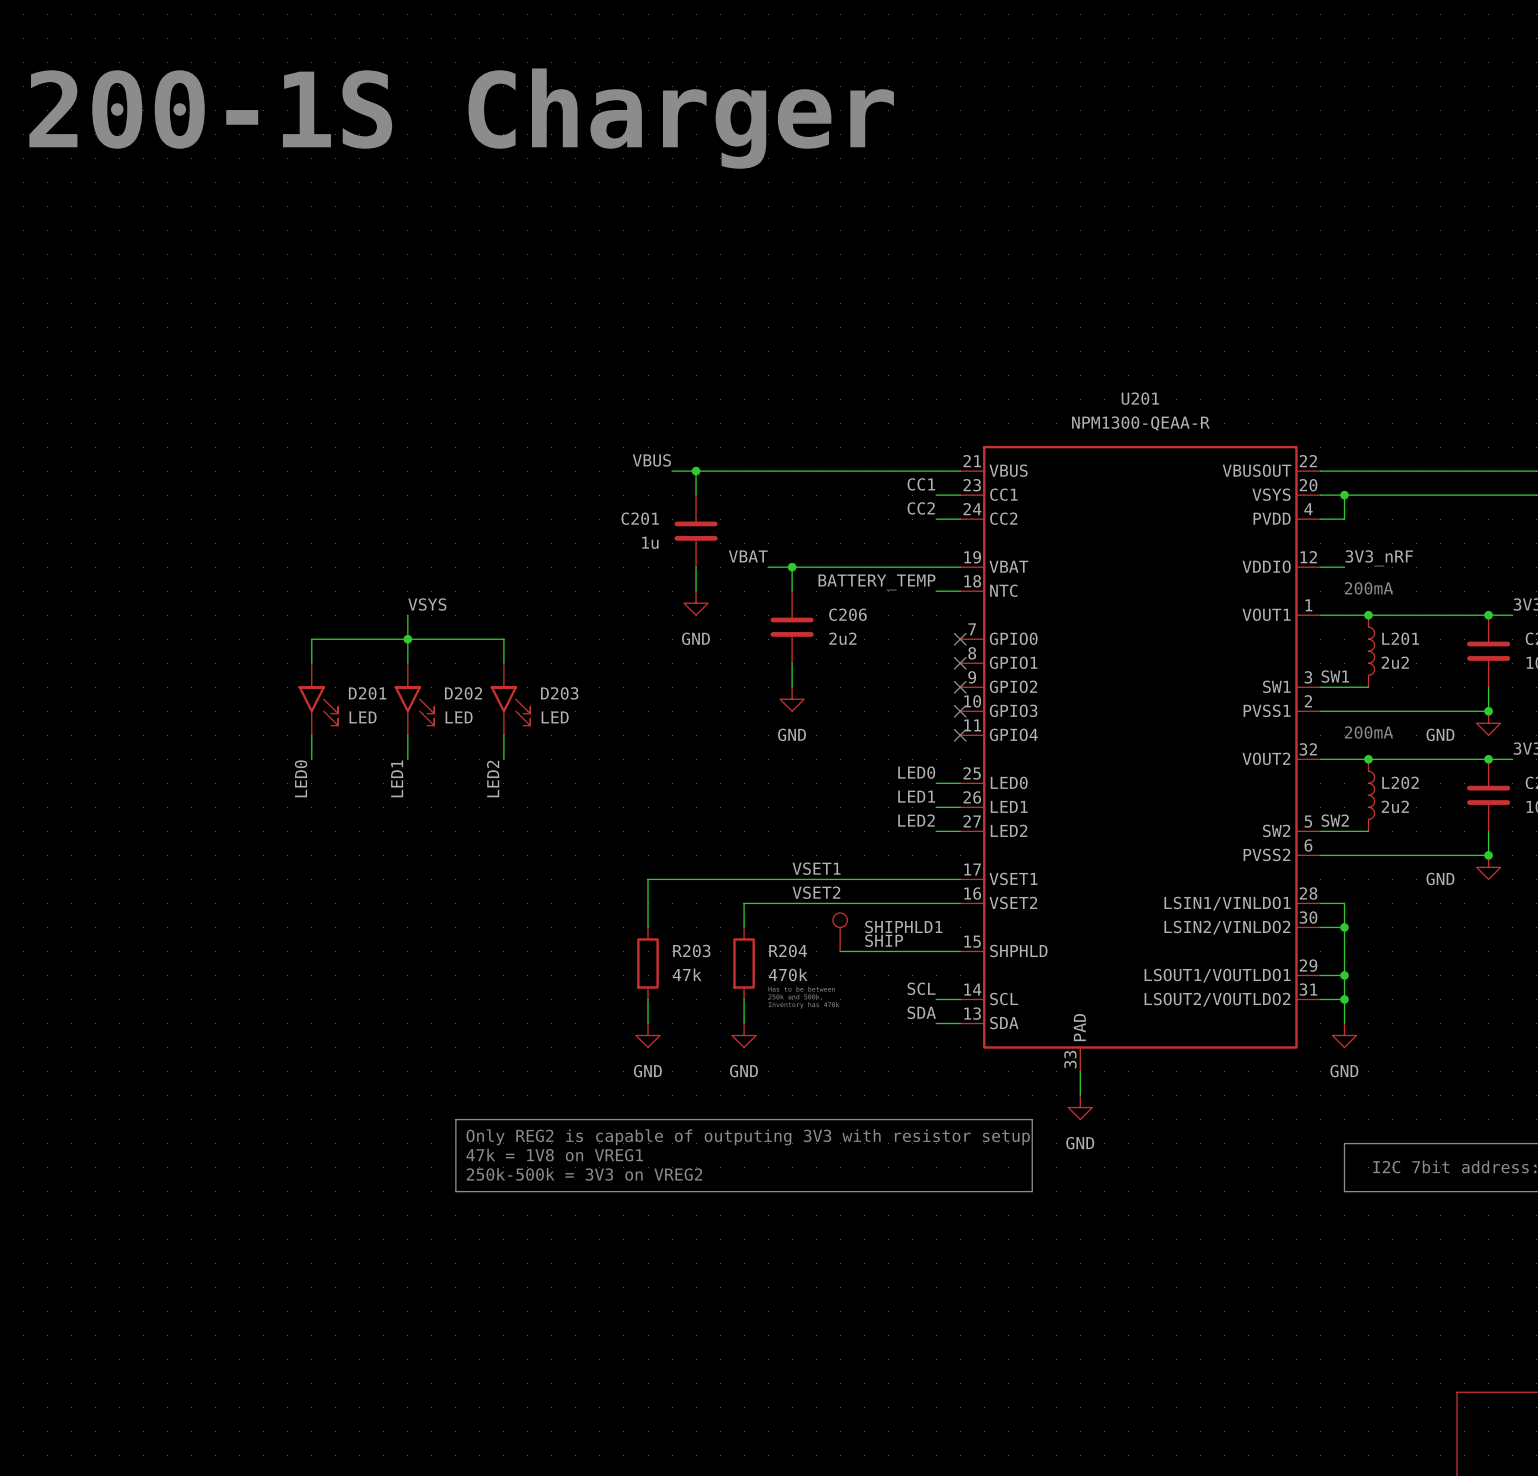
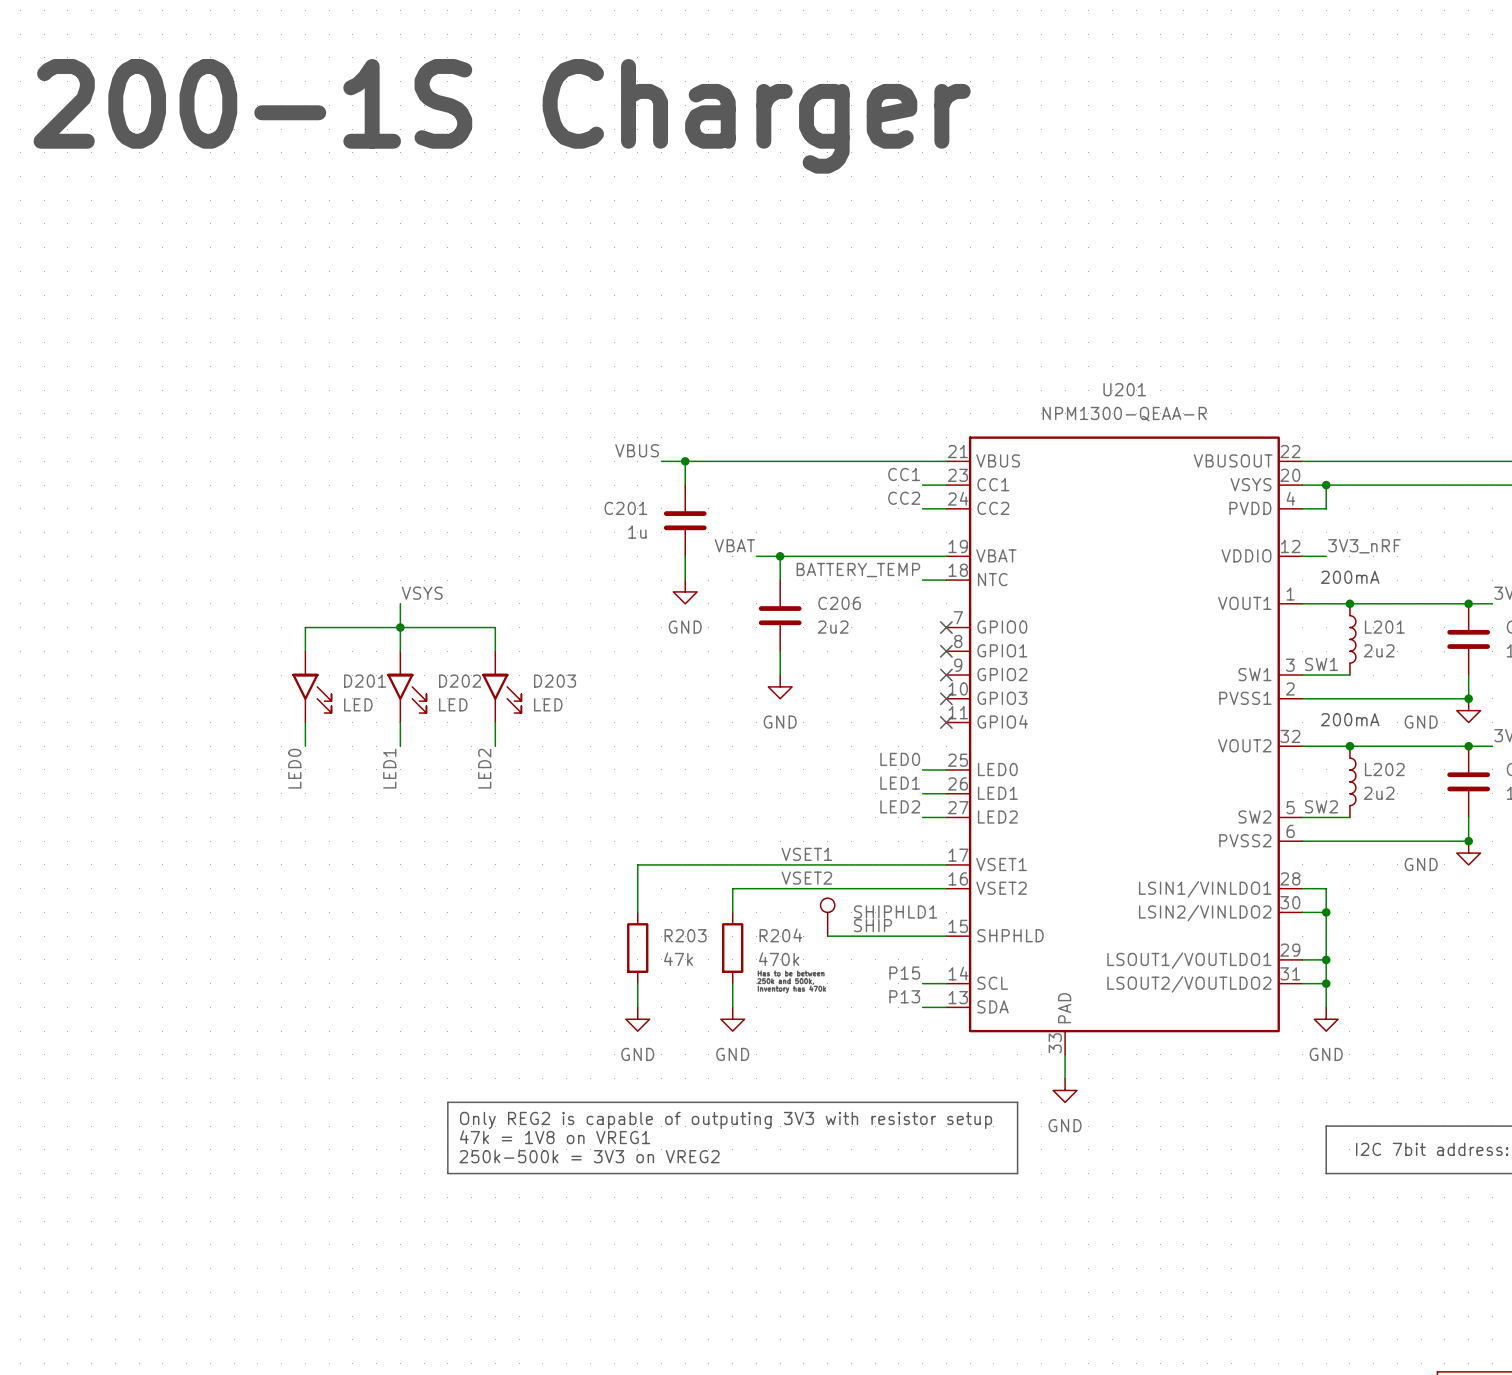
label: SCL (921, 988) -> P15 (904, 973)
label: SDA (921, 1012) -> P13 (904, 996)

